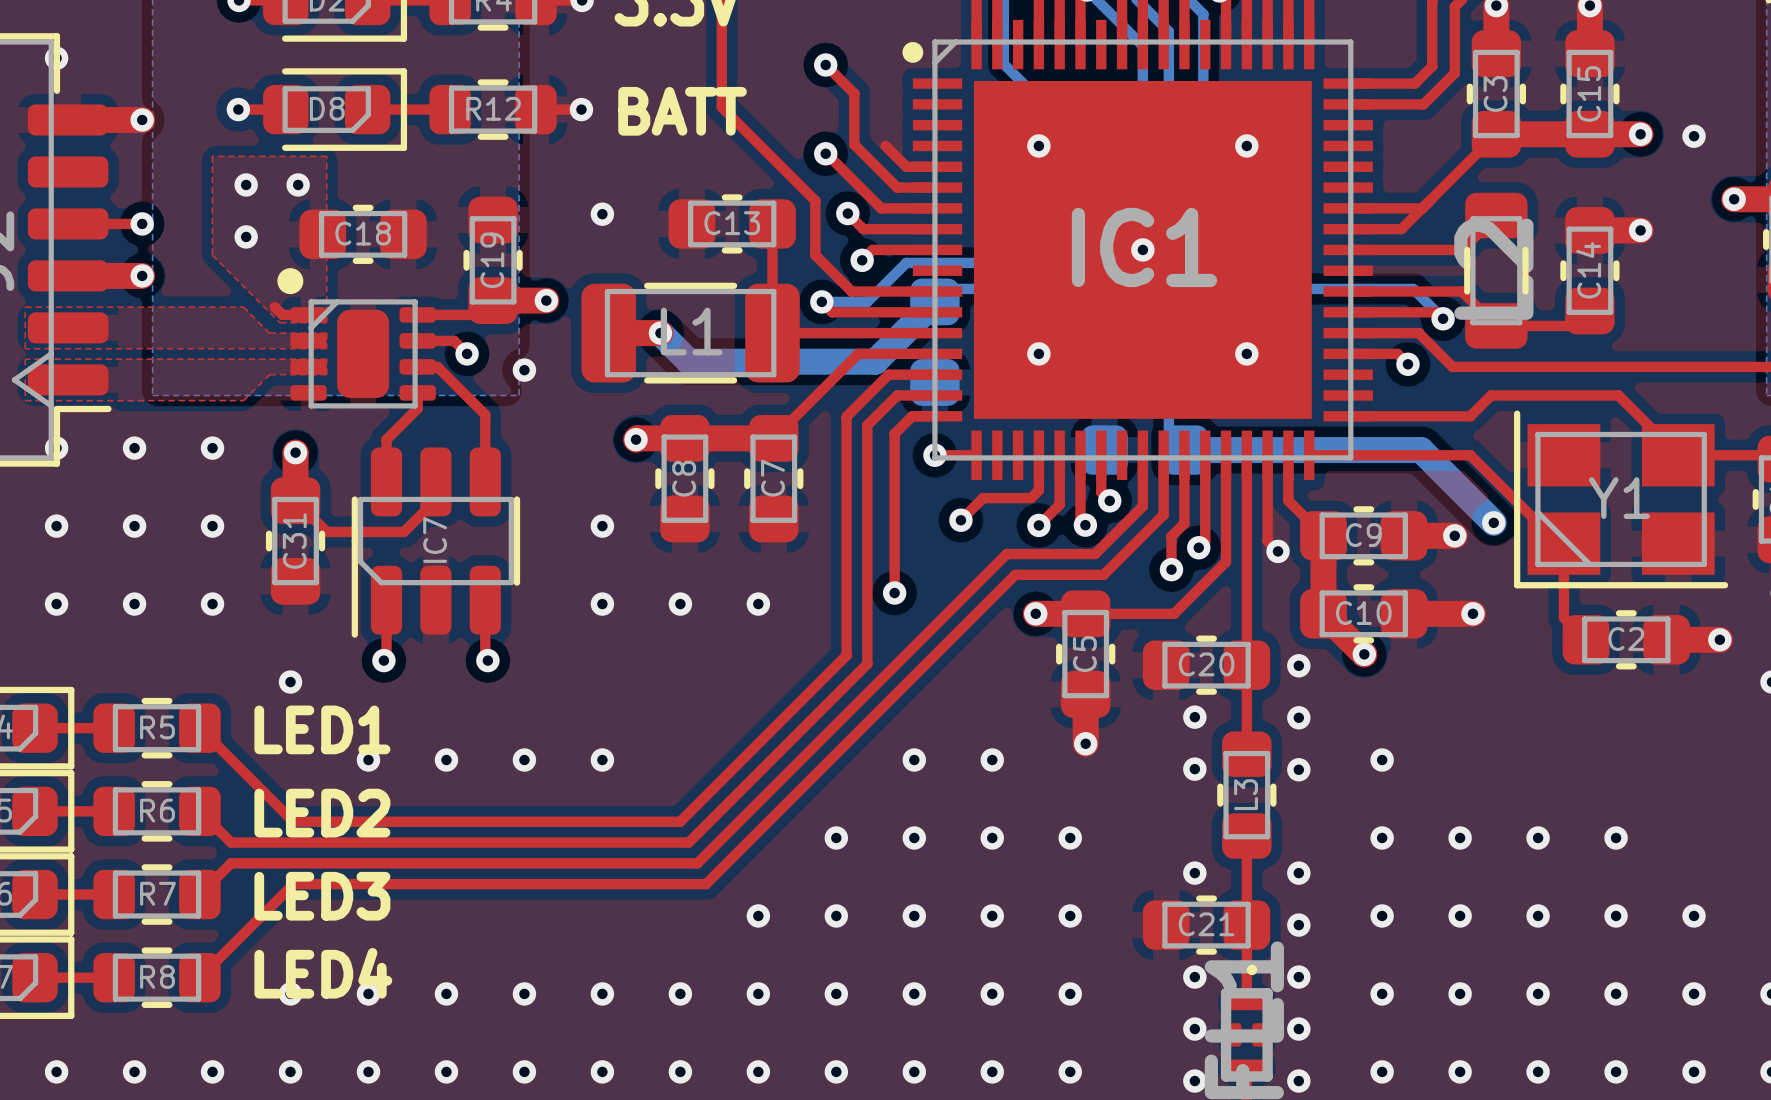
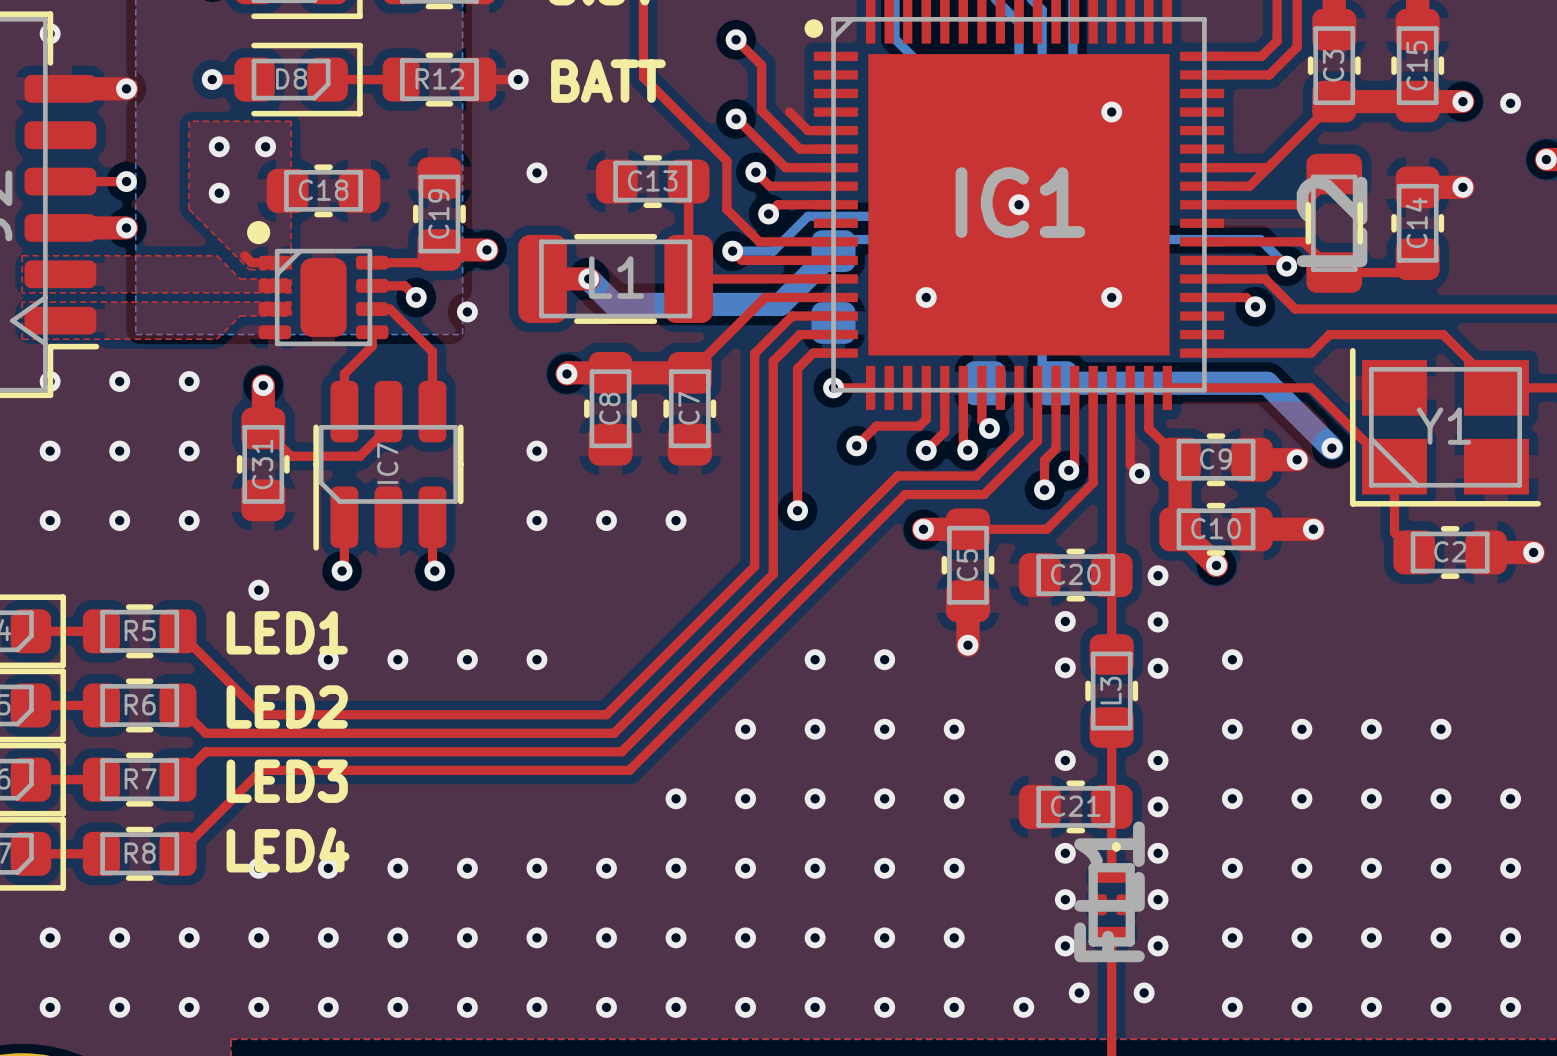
via: (1038, 145) -> none

